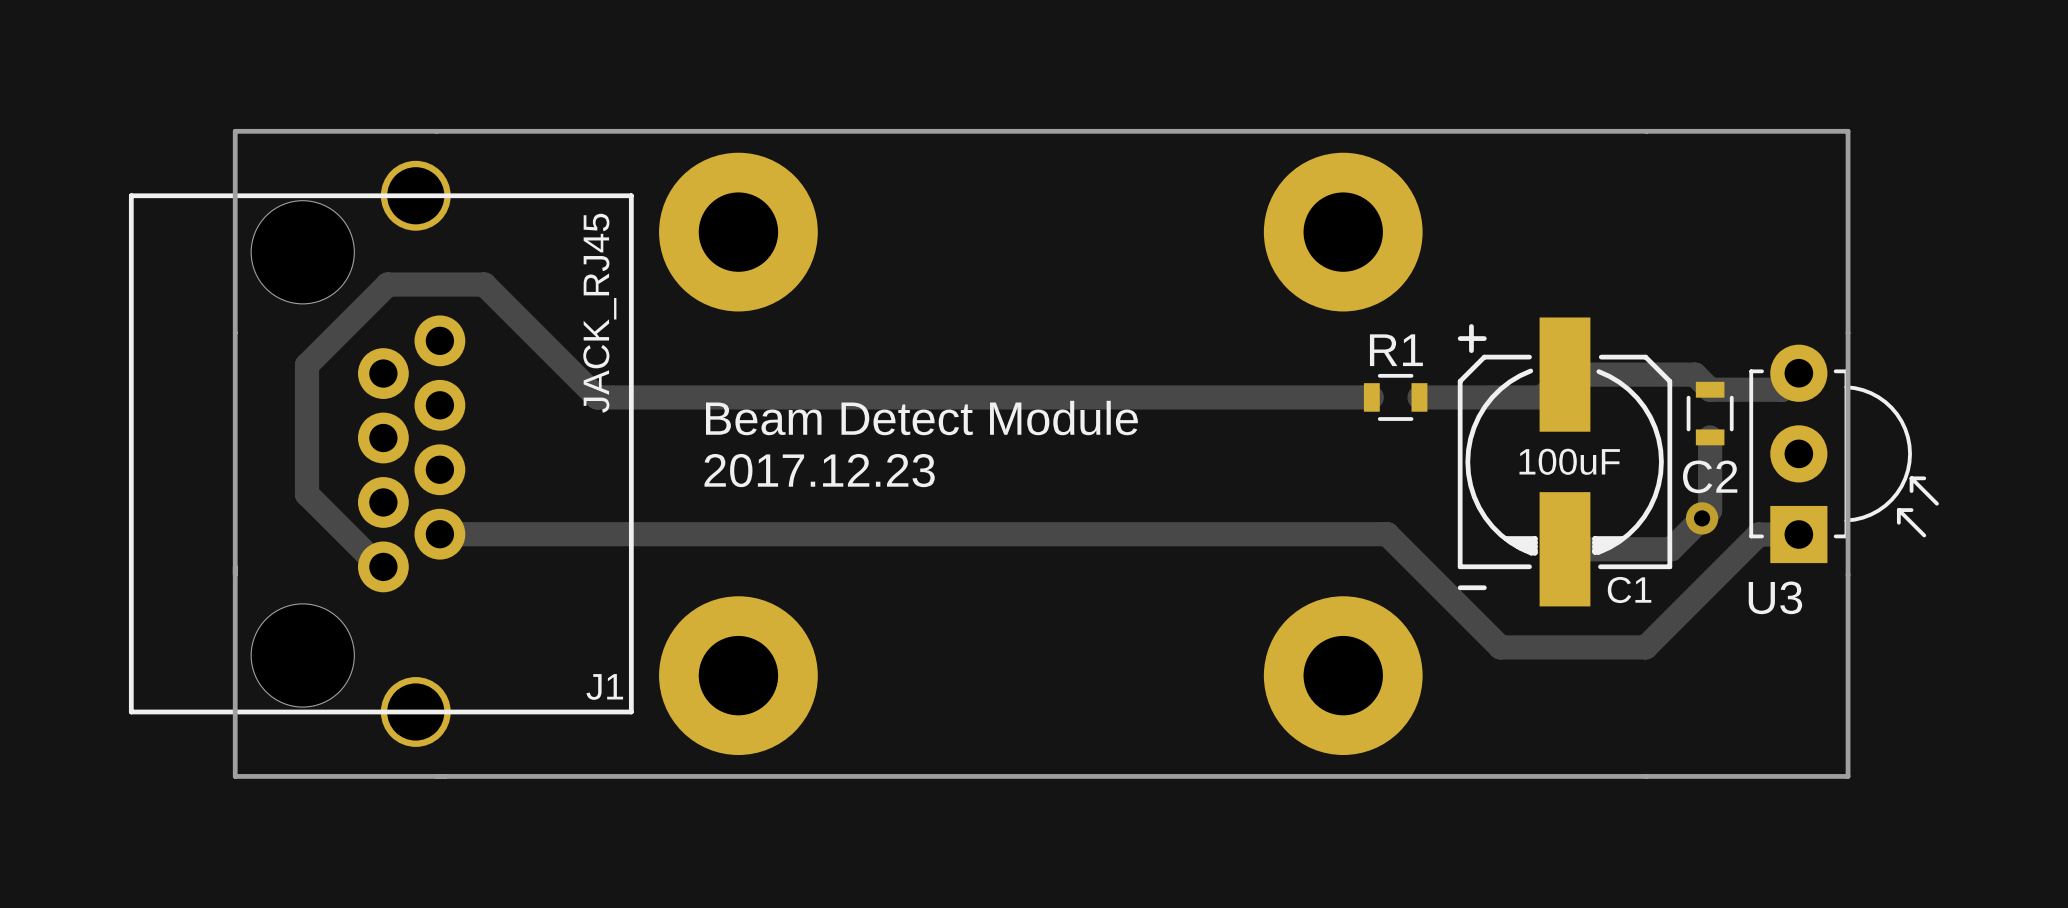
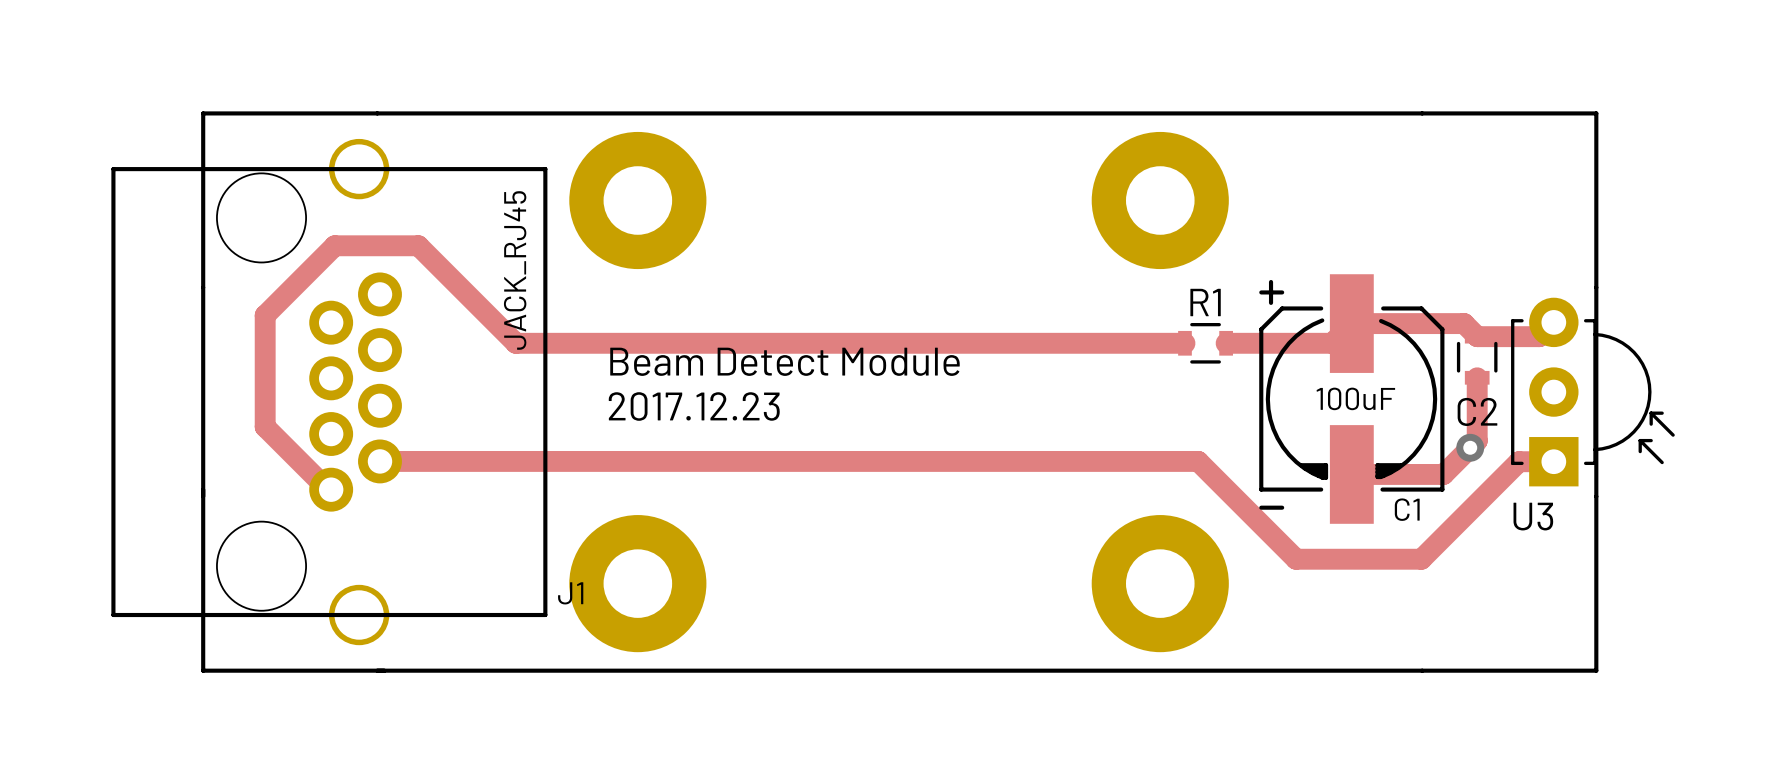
J1 name position: J1 (604, 686) -> J1 (570, 593)

